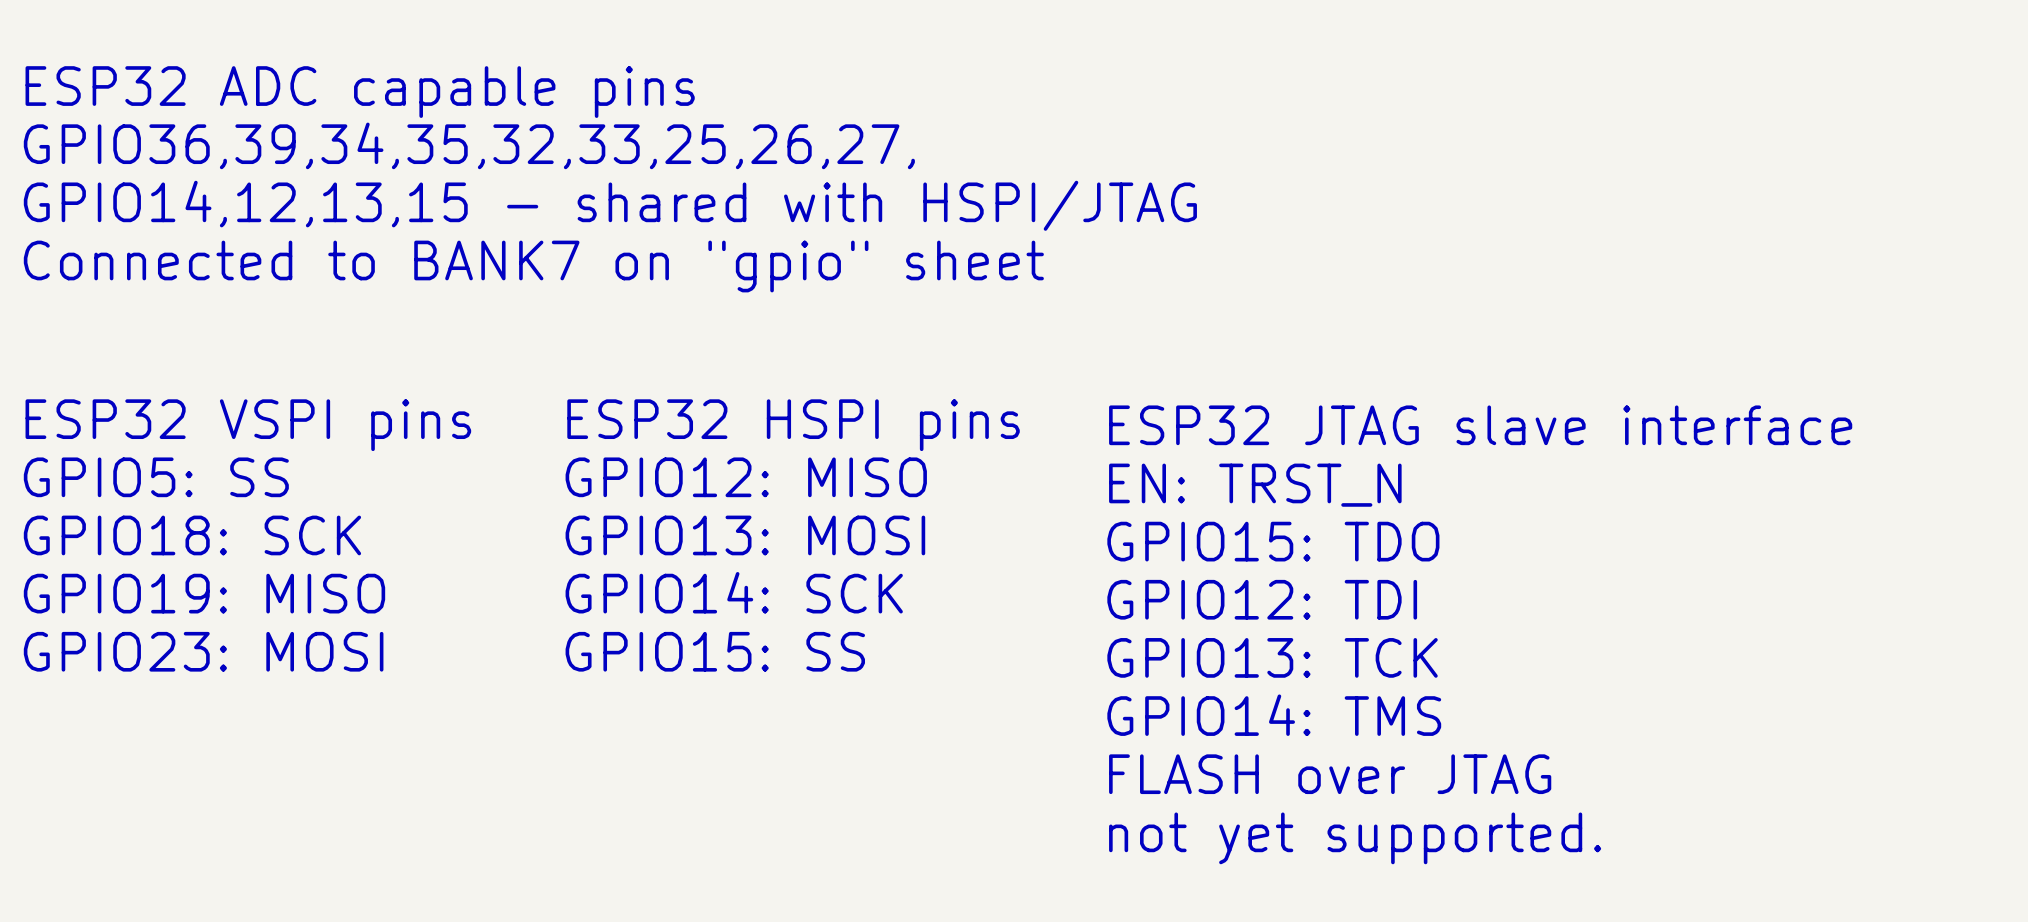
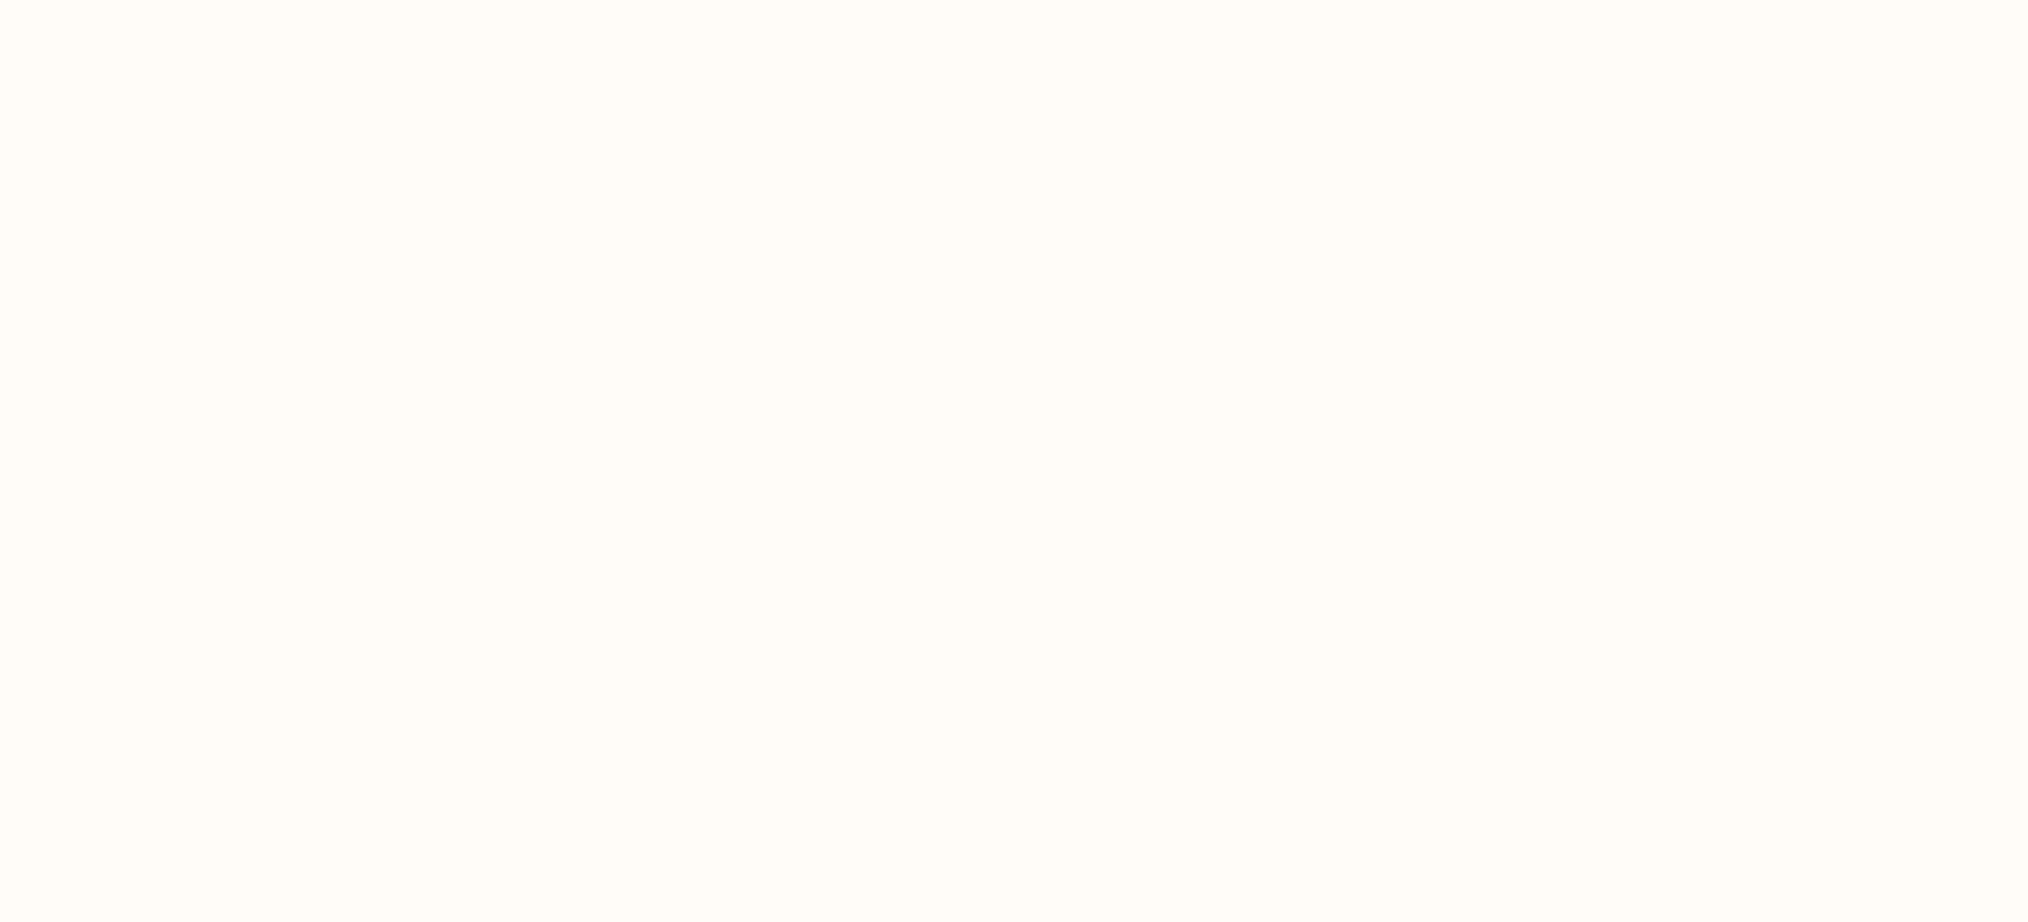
text: ESP32 ADC capable pins (360, 92) -> none
text: GPIO36,39,34,35,32,33,25,26,27, (469, 145) -> none
text: GPIO14,12,13,15 - shared with HSPI/JTAG (610, 205) -> none
text: Connected to BANK7 on "gpio" sheet (533, 266) -> none
text: ESP32 VSPI pins (248, 425) -> none
text: ESP32 HSPI pins (793, 425) -> none
text: ESP32 JTAG slave interface (1480, 425) -> none
text: GPIO5: SS (156, 477) -> none
text: GPIO12: MISO (746, 477) -> none
text: EN: TRST_N (1255, 485) -> none
text: GPIO18: SCK (192, 535) -> none
text: GPIO13: MOSI (745, 535) -> none
text: GPIO15: TDO (1273, 541) -> none
text: GPIO14: SCK (734, 592) -> none
text: GPIO19: MISO (204, 593) -> none
text: GPIO12: TDI (1262, 599) -> none
text: GPIO23: MOSI (203, 651) -> none
text: GPIO15: SS (715, 651) -> none
text: GPIO13: TCK (1272, 657) -> none
text: GPIO14: TMS (1274, 715) -> none
text: FLASH over JTAG (1330, 774) -> none
text: not yet supported. (1355, 838) -> none

